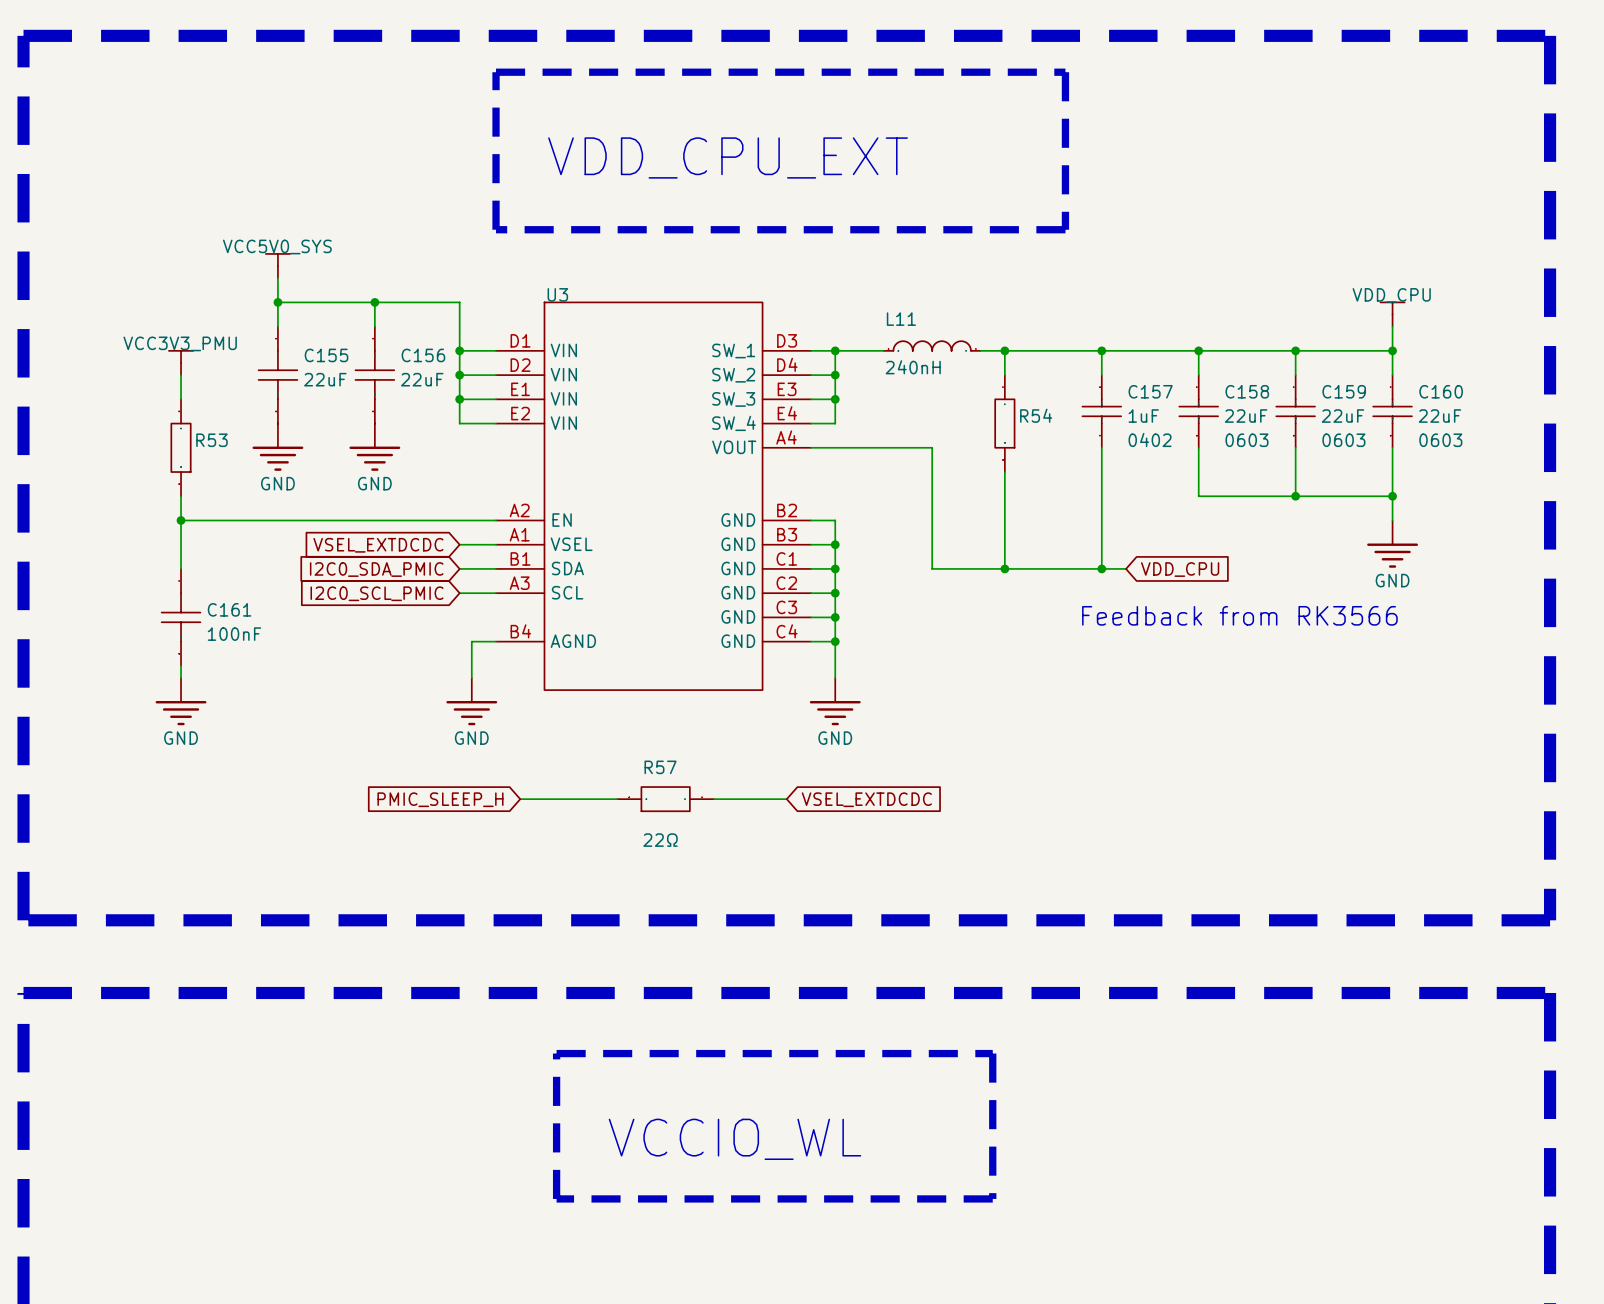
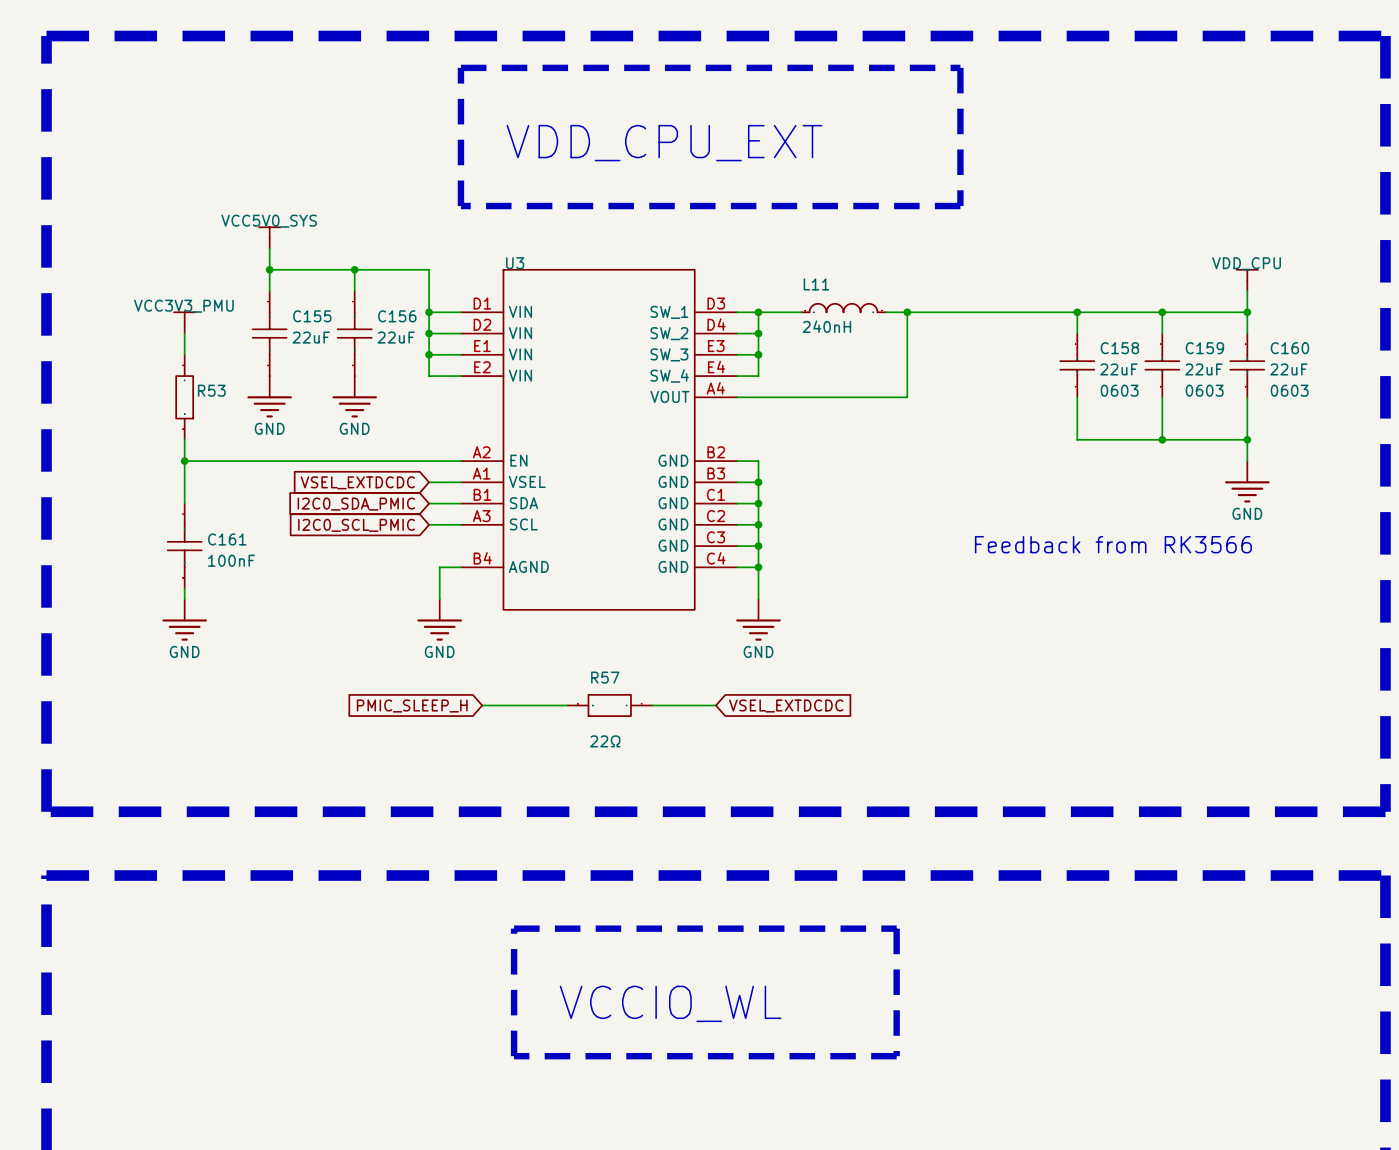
wire: (1101, 350) (1101, 375) -> none
junction: (1101, 350) -> none
C157: 1uF (1101, 411) -> none
R54: (1004, 423) -> none
wire: (932, 447) (932, 568) (1126, 568) -> (843, 397) (907, 397) (907, 333)
wire: (1101, 447) (1101, 568) -> none
wire: (1004, 472) (1004, 568) -> none
junction: (1004, 568) -> none
junction: (1101, 568) -> none
global label: VDD_CPU (1180, 569) -> none

